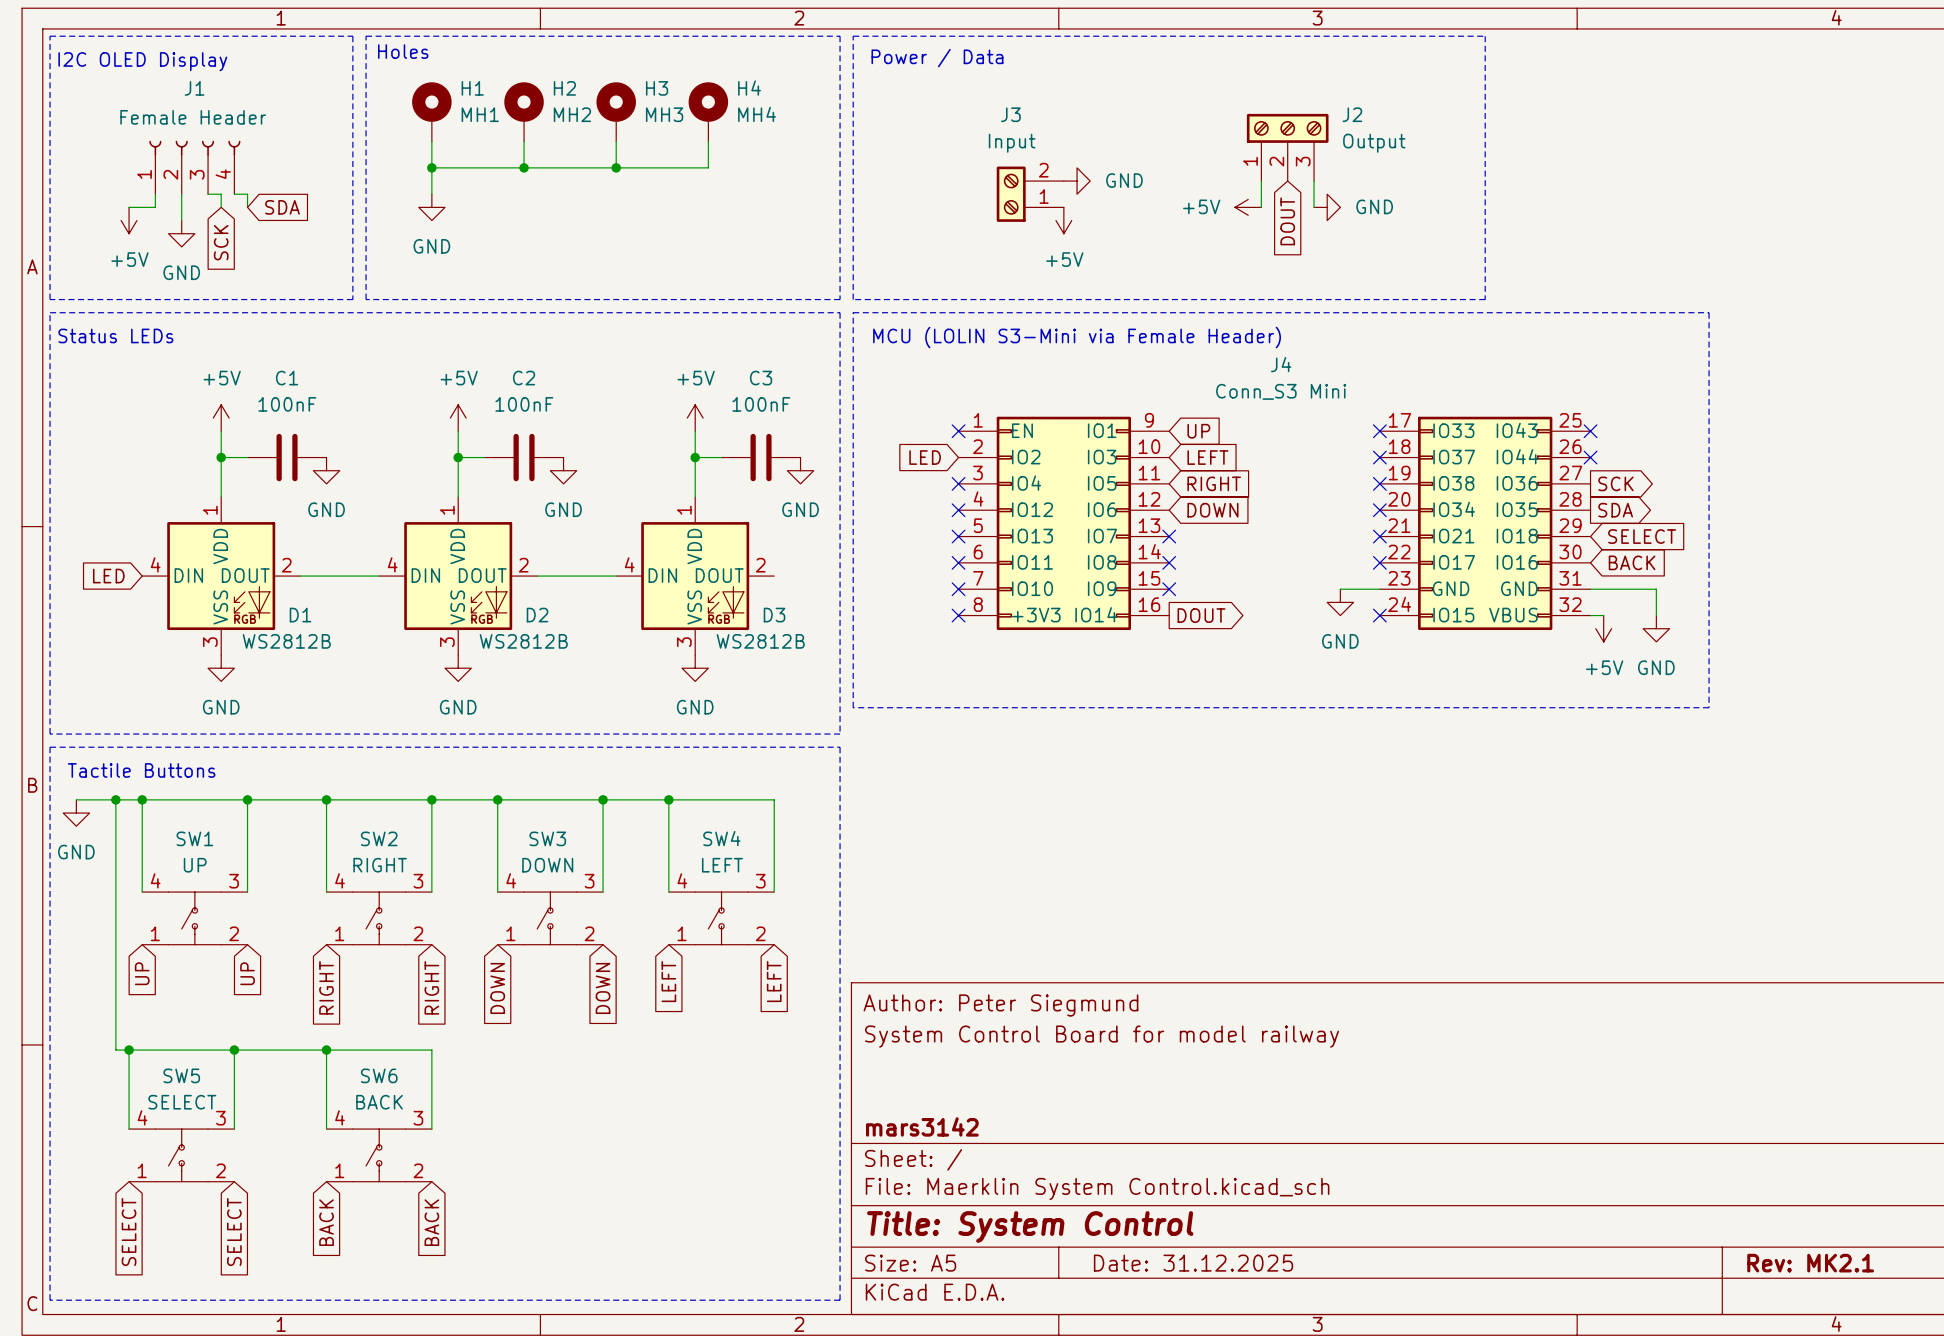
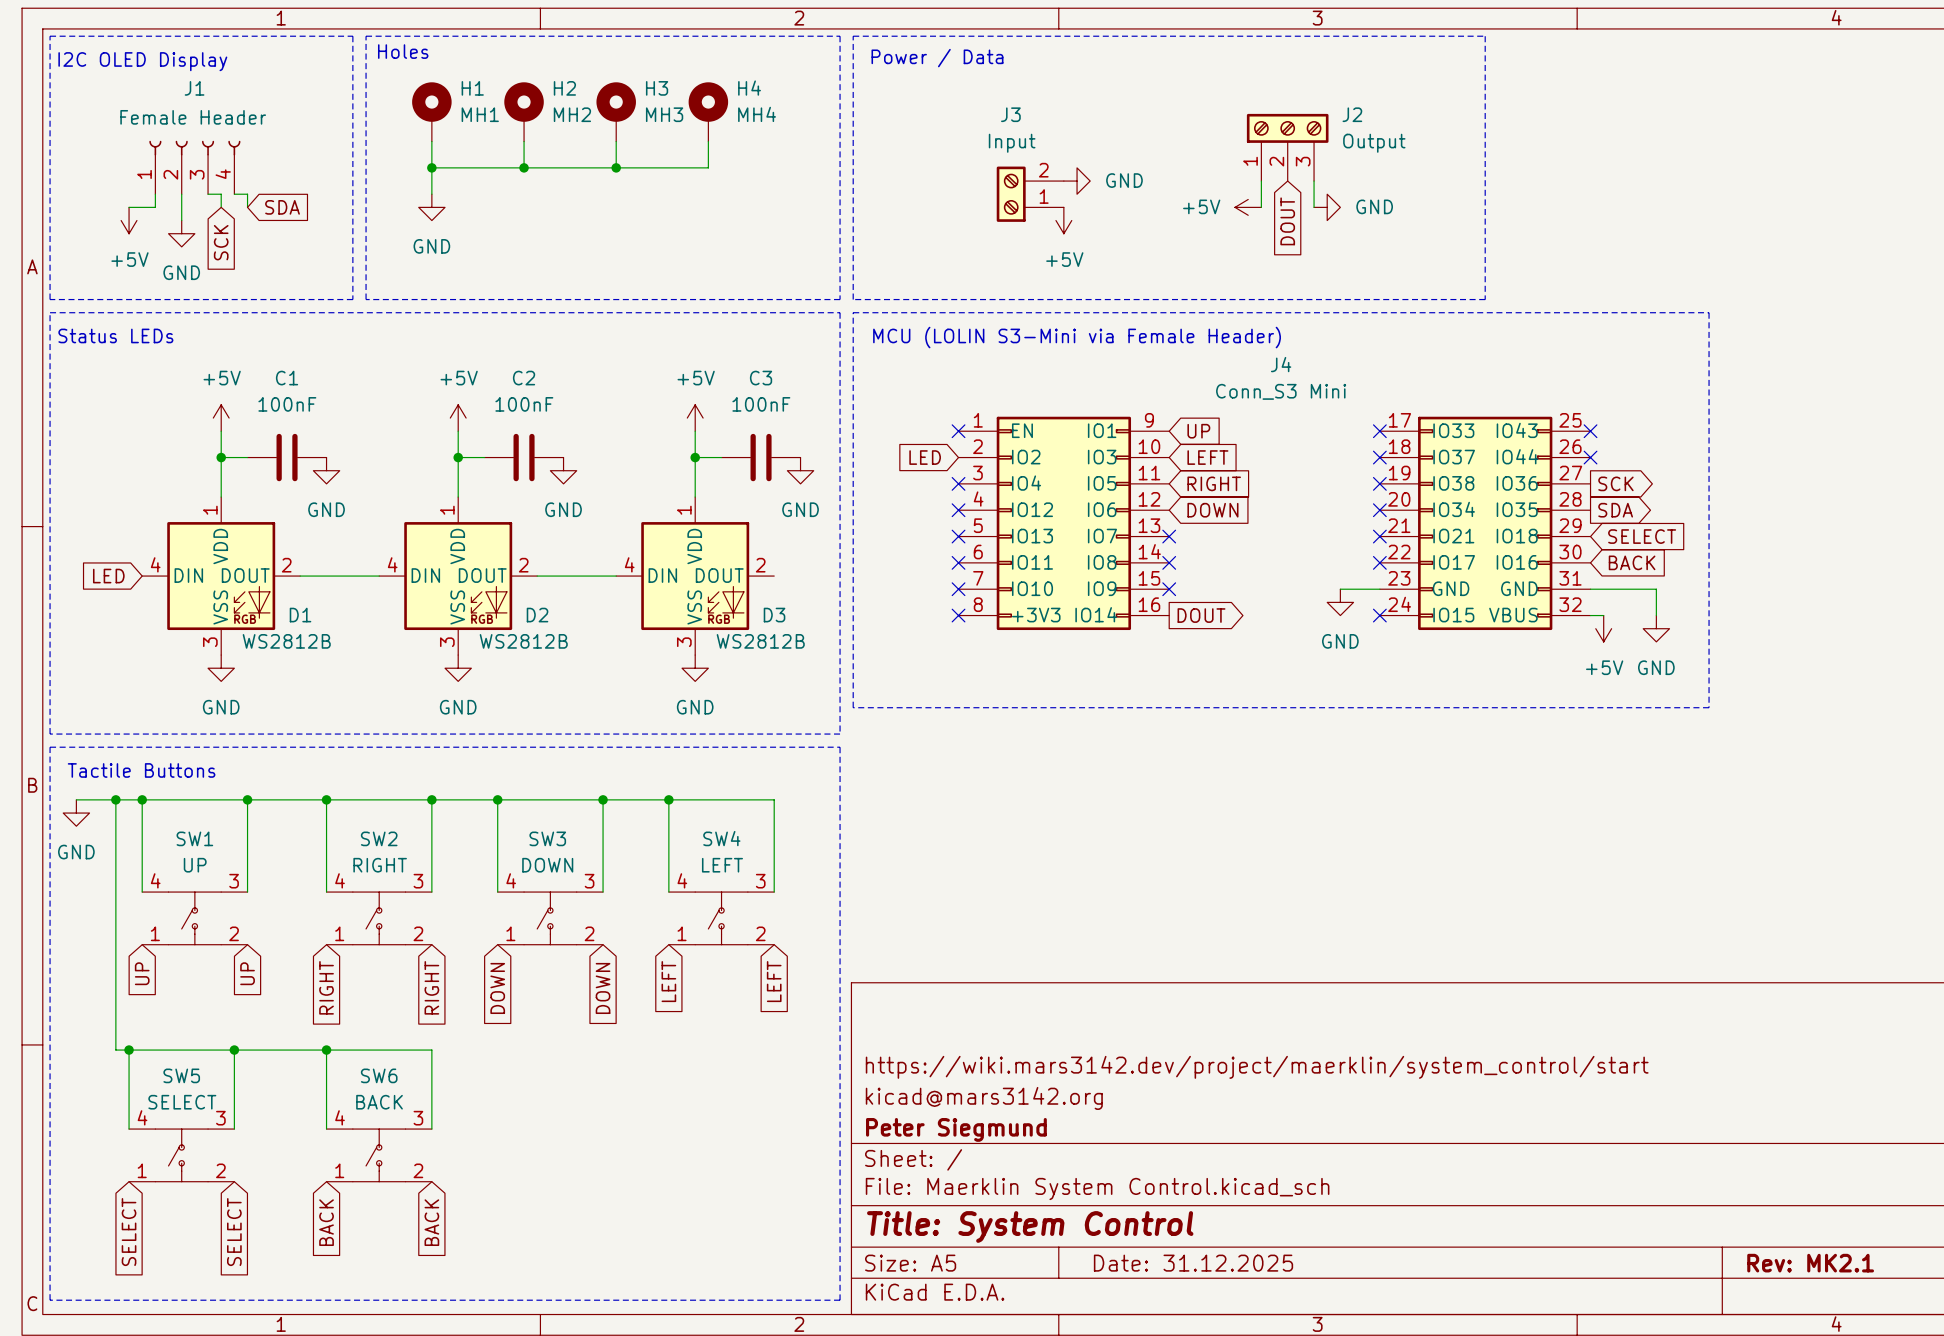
title block: Author: Peter Siegmund (1000, 1005) -> none
title block: System Control Board for model railway (1102, 1036) -> none
title block: none -> https://wiki.mars3142.dev/project/maerklin/system_control/start (1257, 1067)
title block: none -> kicad@mars3142.org (984, 1098)
title block: mars3142 (922, 1126) -> Peter Siegmund (956, 1129)

